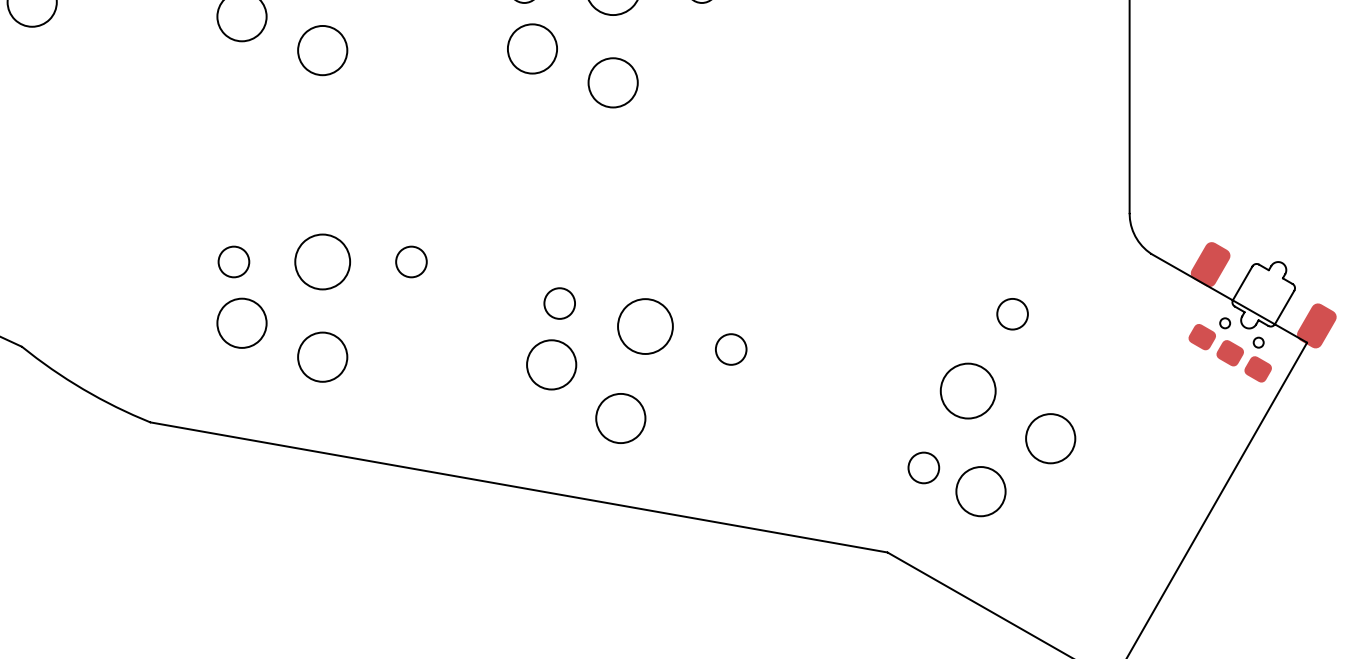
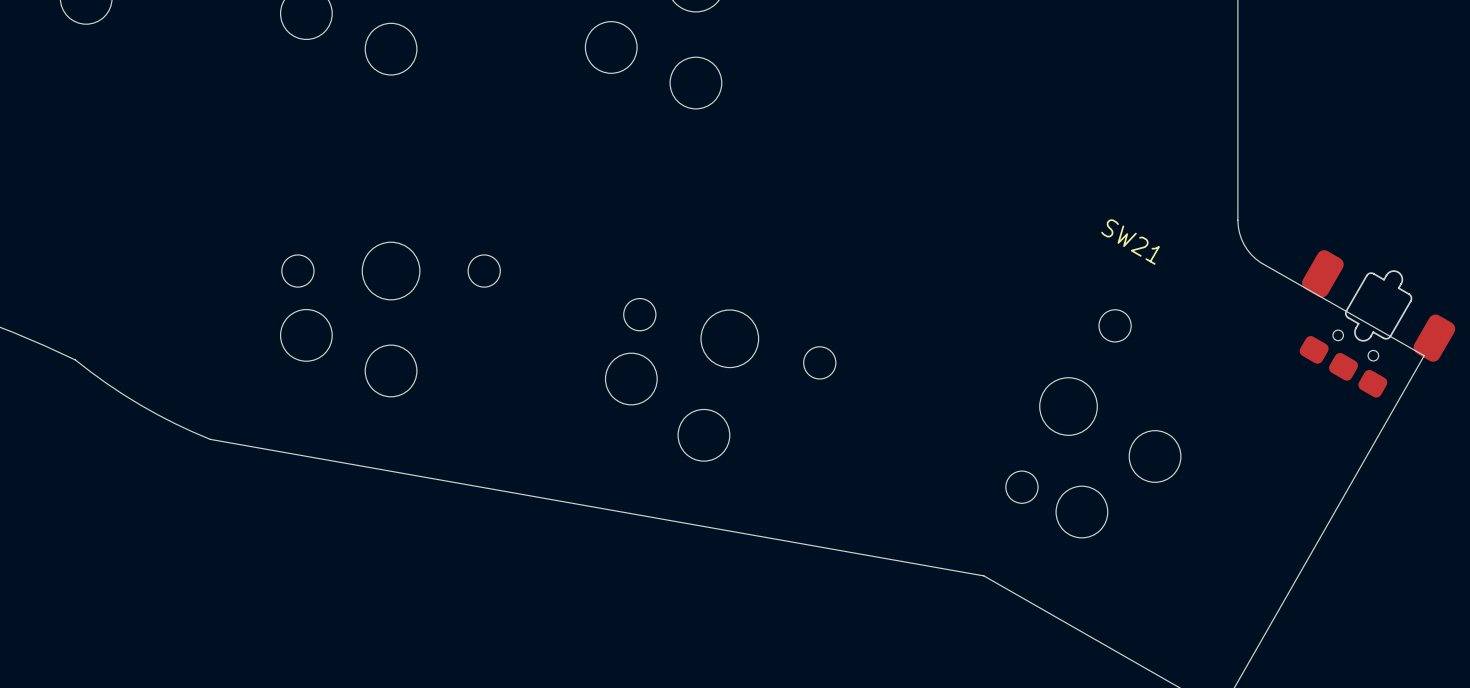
SW21 name: none -> SW21 (1130, 242)

